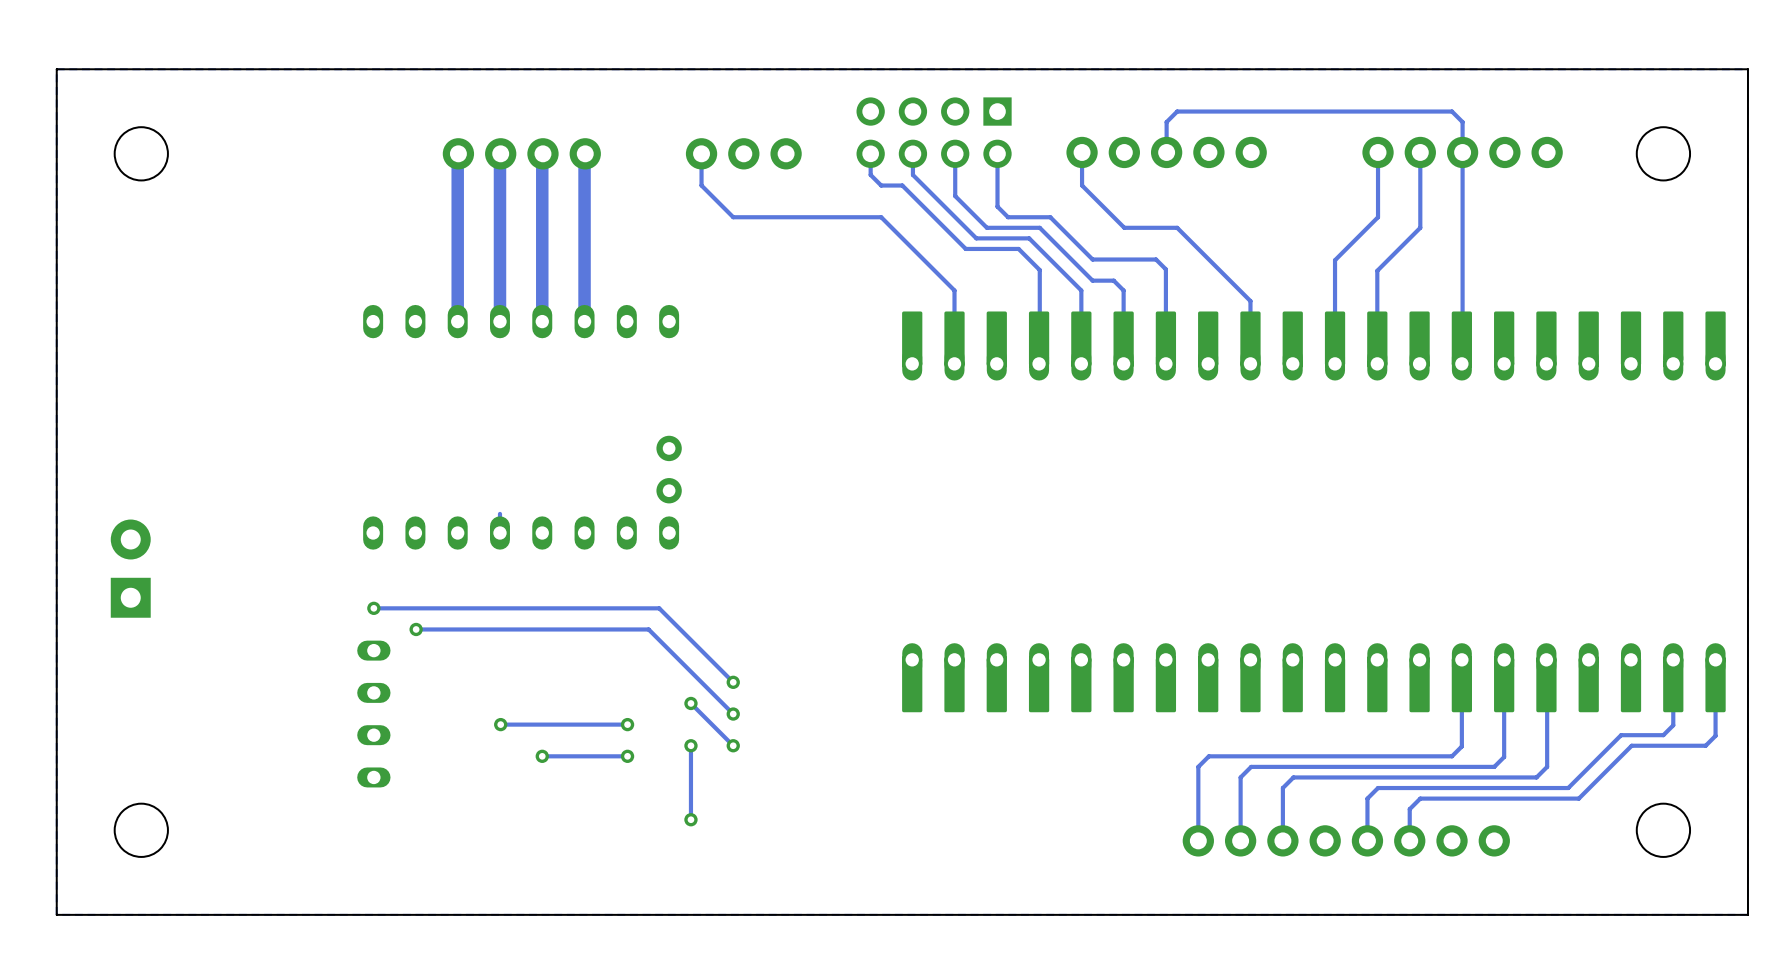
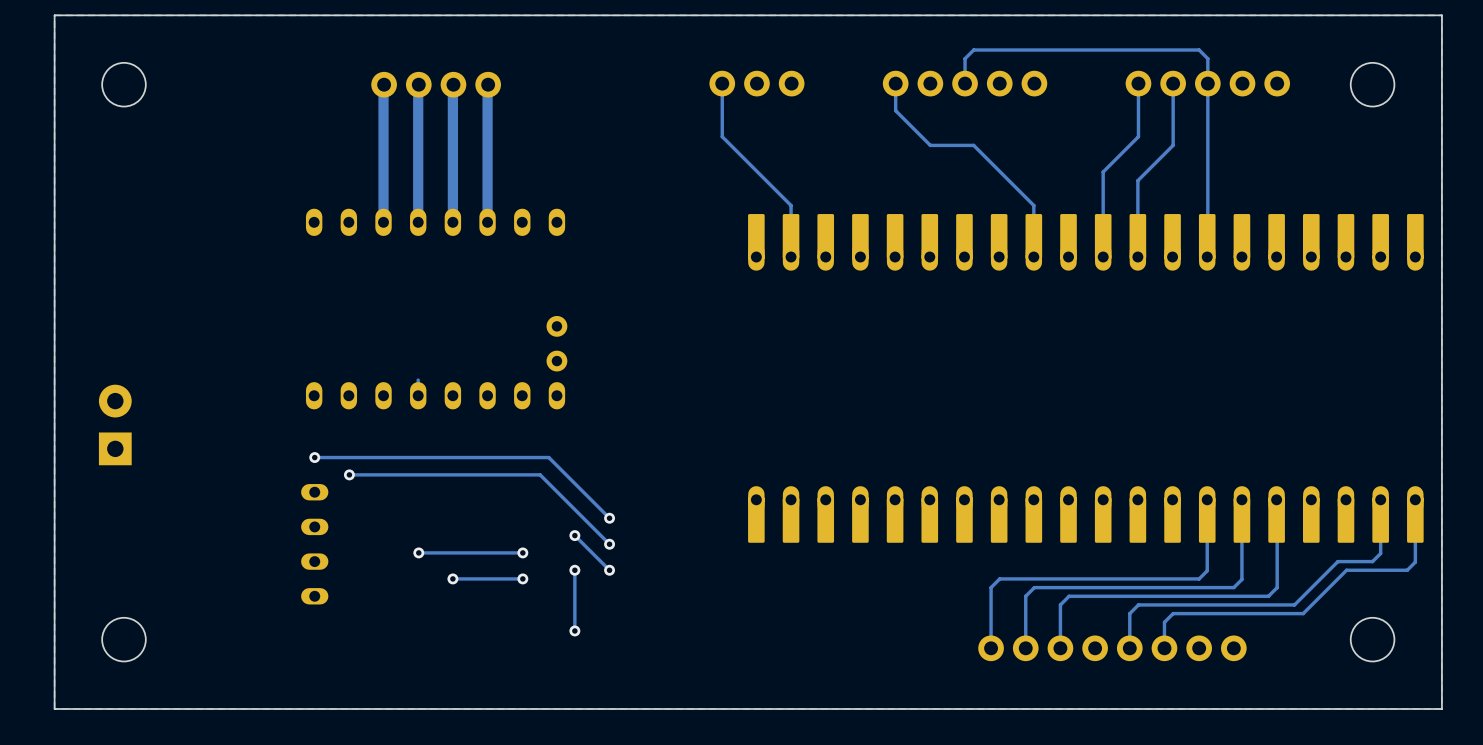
part: (934, 132) -> none
track: (701, 153) (701, 185) (733, 217) (881, 217) (954, 290) (954, 301) -> none
part position: (743, 153) -> (756, 83)
track: (912, 153) (912, 174) (976, 238) (1029, 238) (1081, 290) (1081, 363) -> none
track: (955, 153) (955, 196) (986, 227) (1039, 227) (1092, 280) (1113, 280) (1123, 290) (1123, 363) -> none
track: (997, 153) (997, 206) (1008, 217) (1050, 217) (1092, 259) (1156, 259) (1165, 269) (1165, 363) -> none
track: (870, 174) (881, 185) (902, 185) (965, 248) (1018, 248) (1039, 270) (1039, 363) -> (722, 102) (722, 136) (791, 205)

